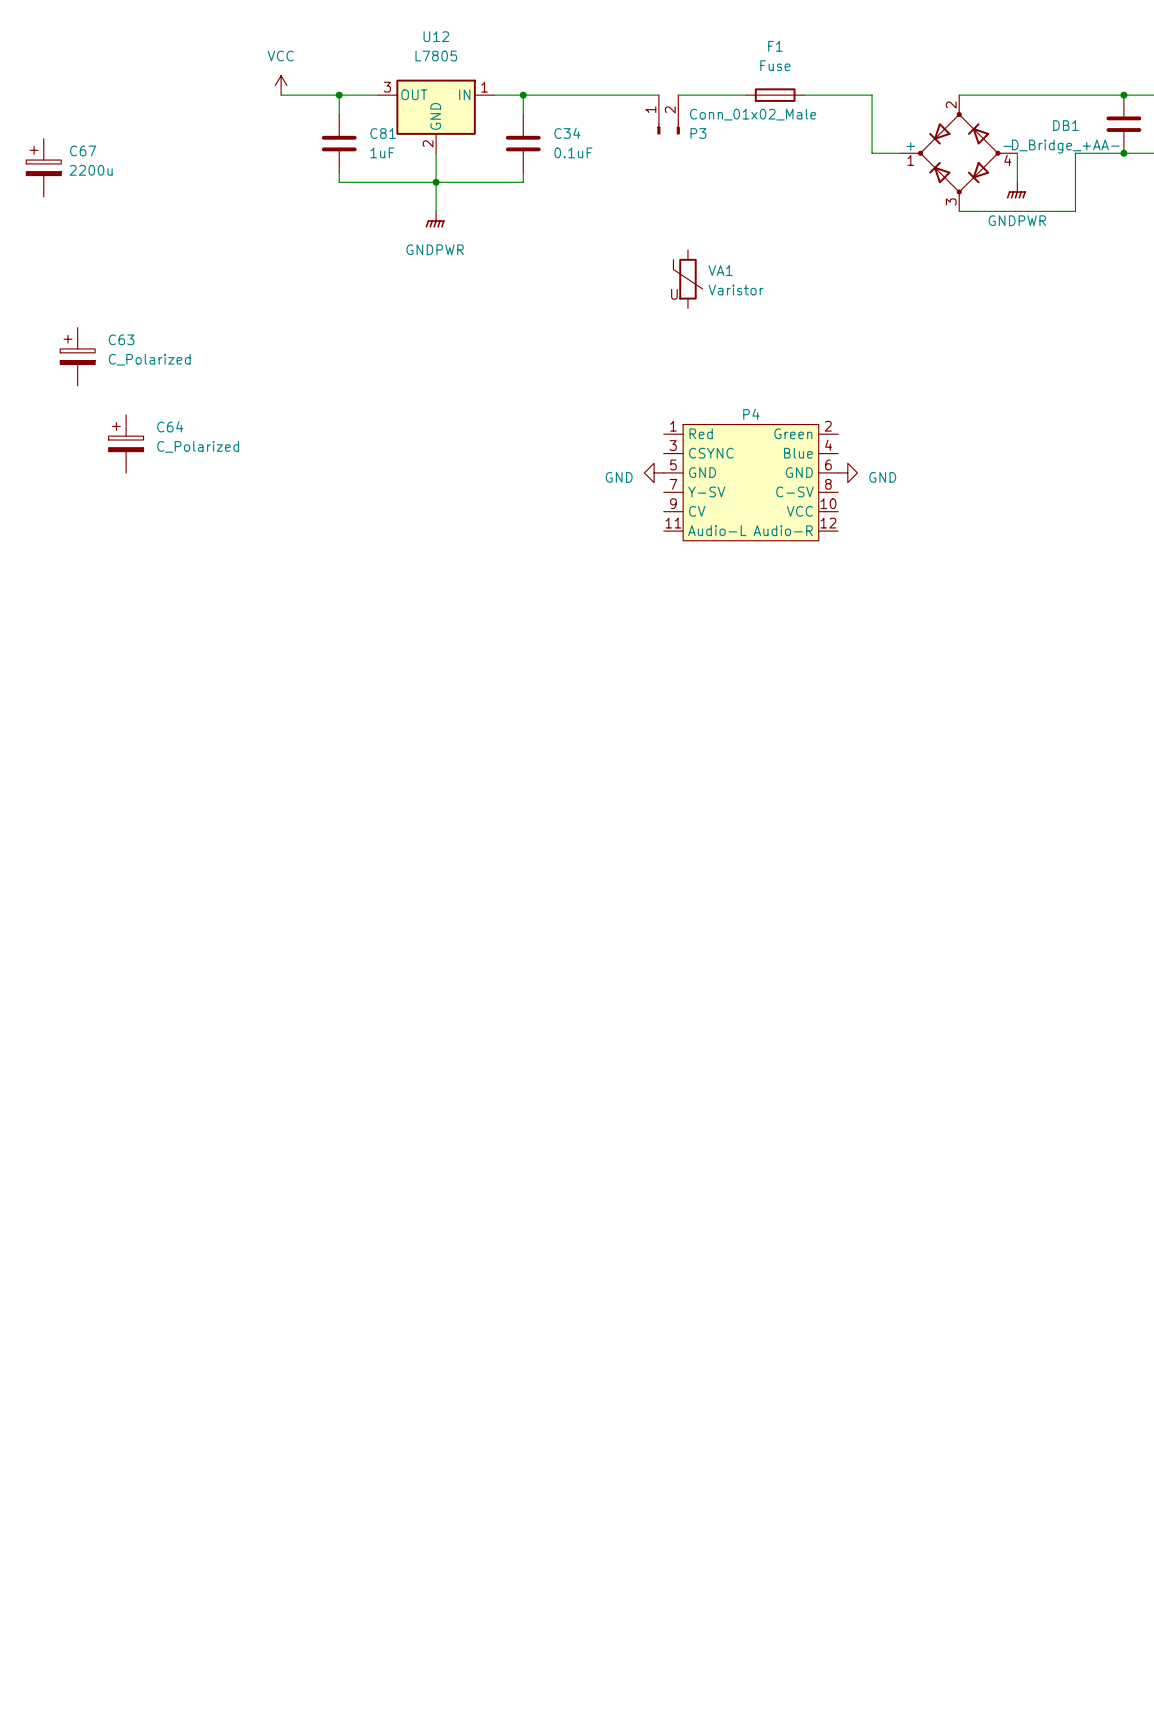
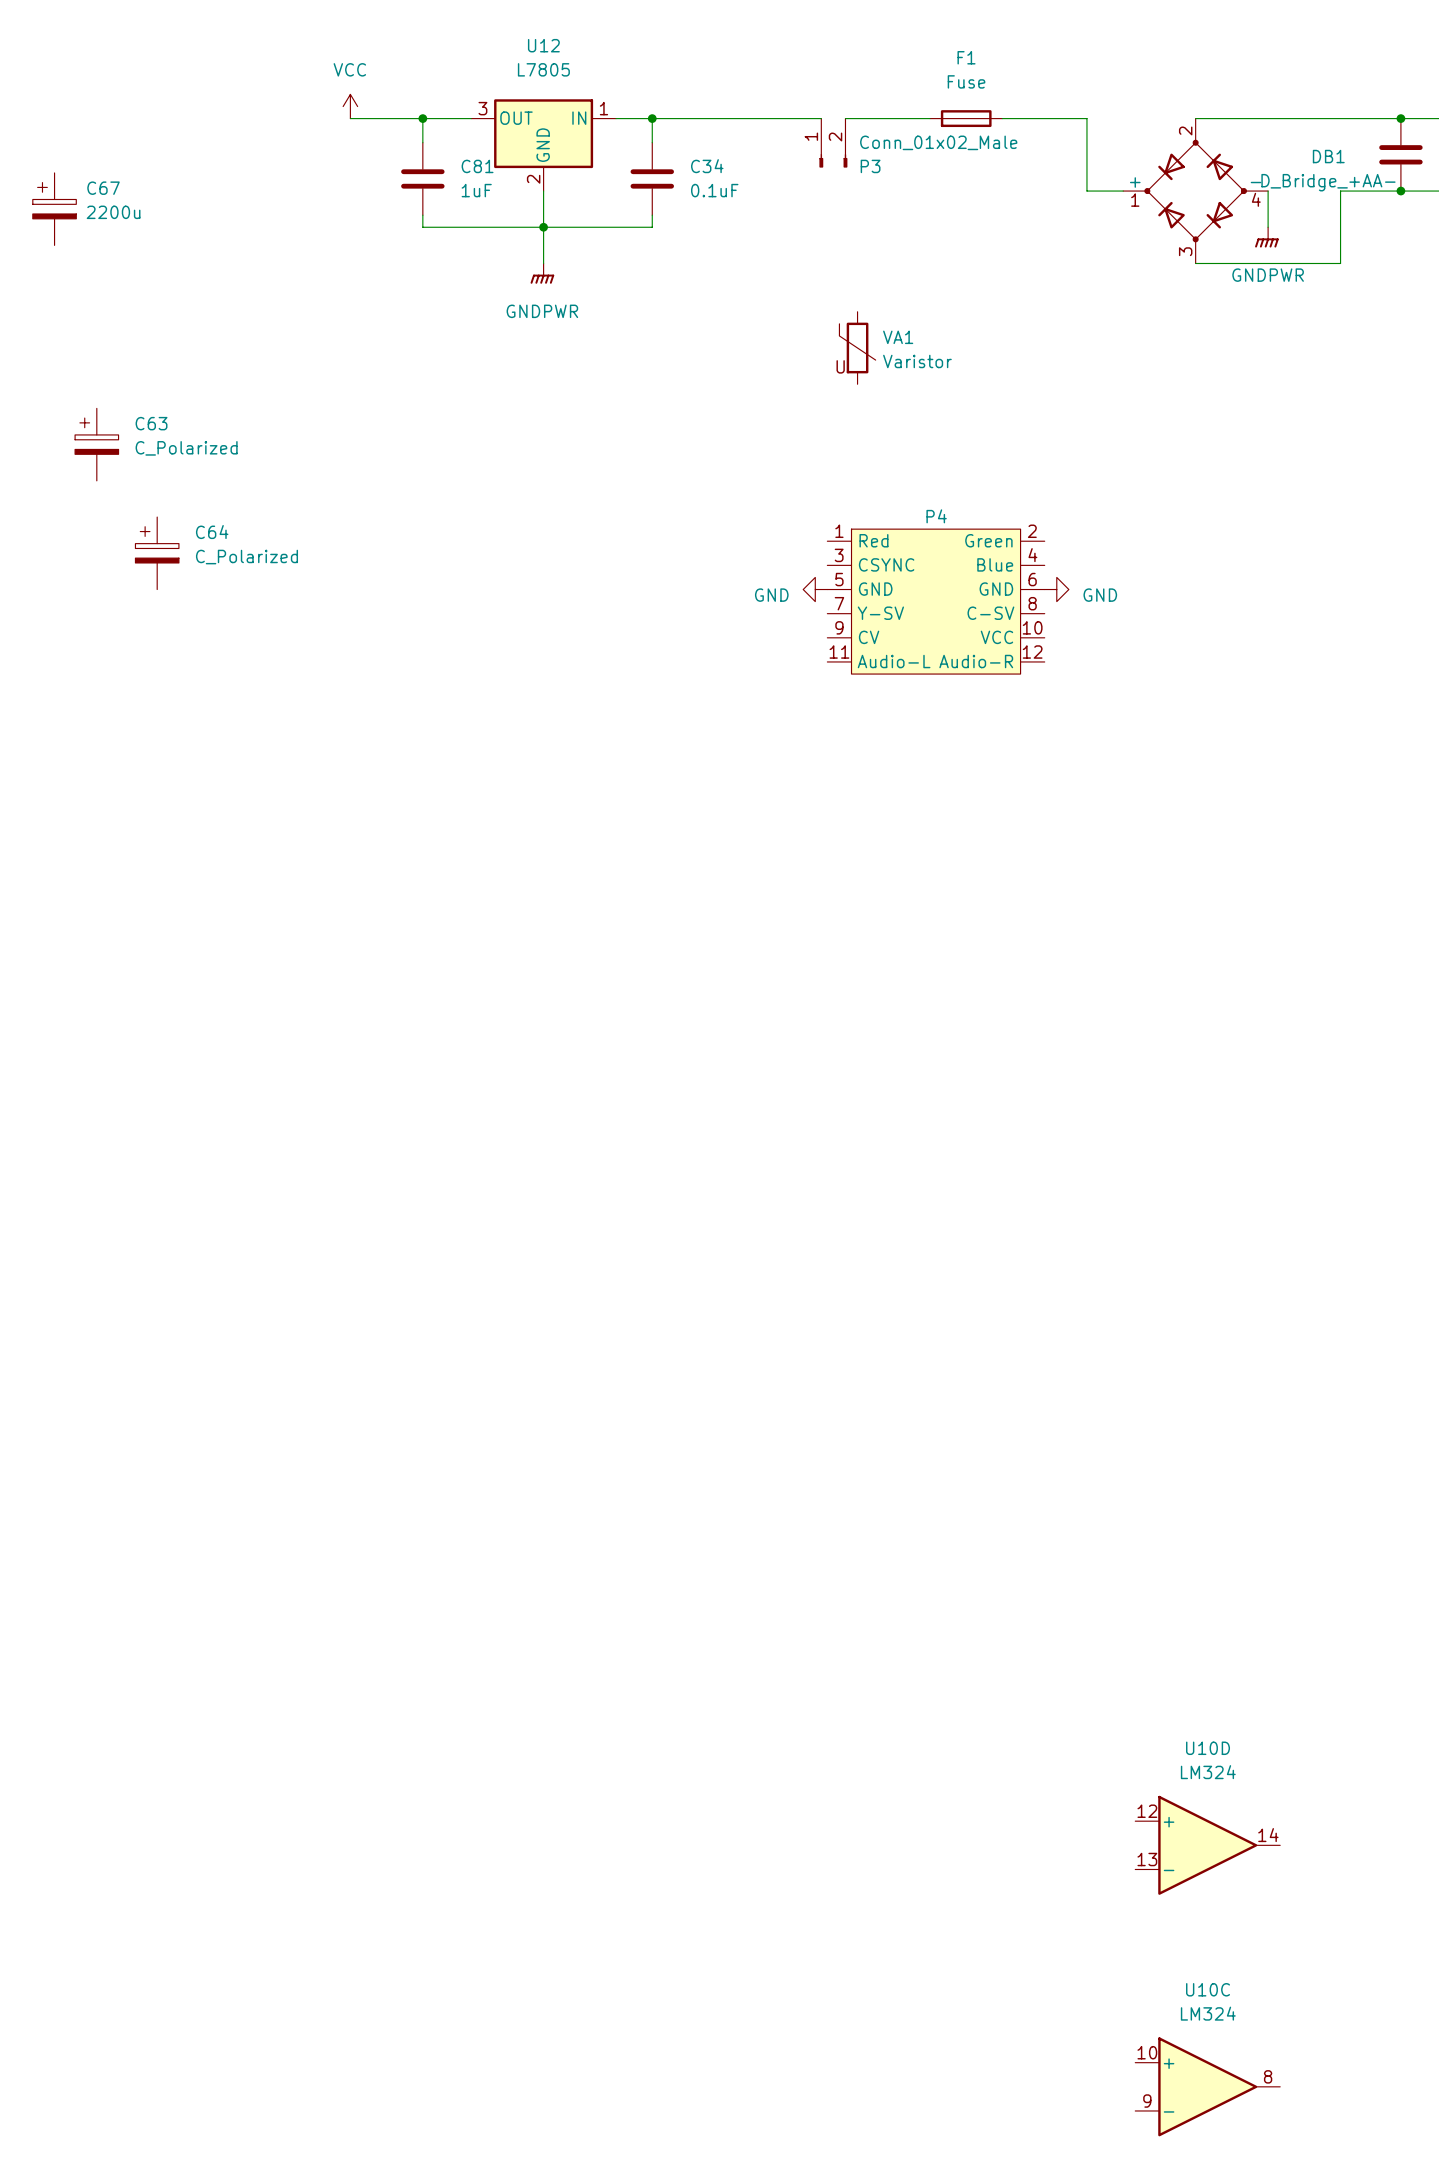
U10D: none -> LM324 (1207, 1845)
U10C: none -> LM324 (1207, 2086)

